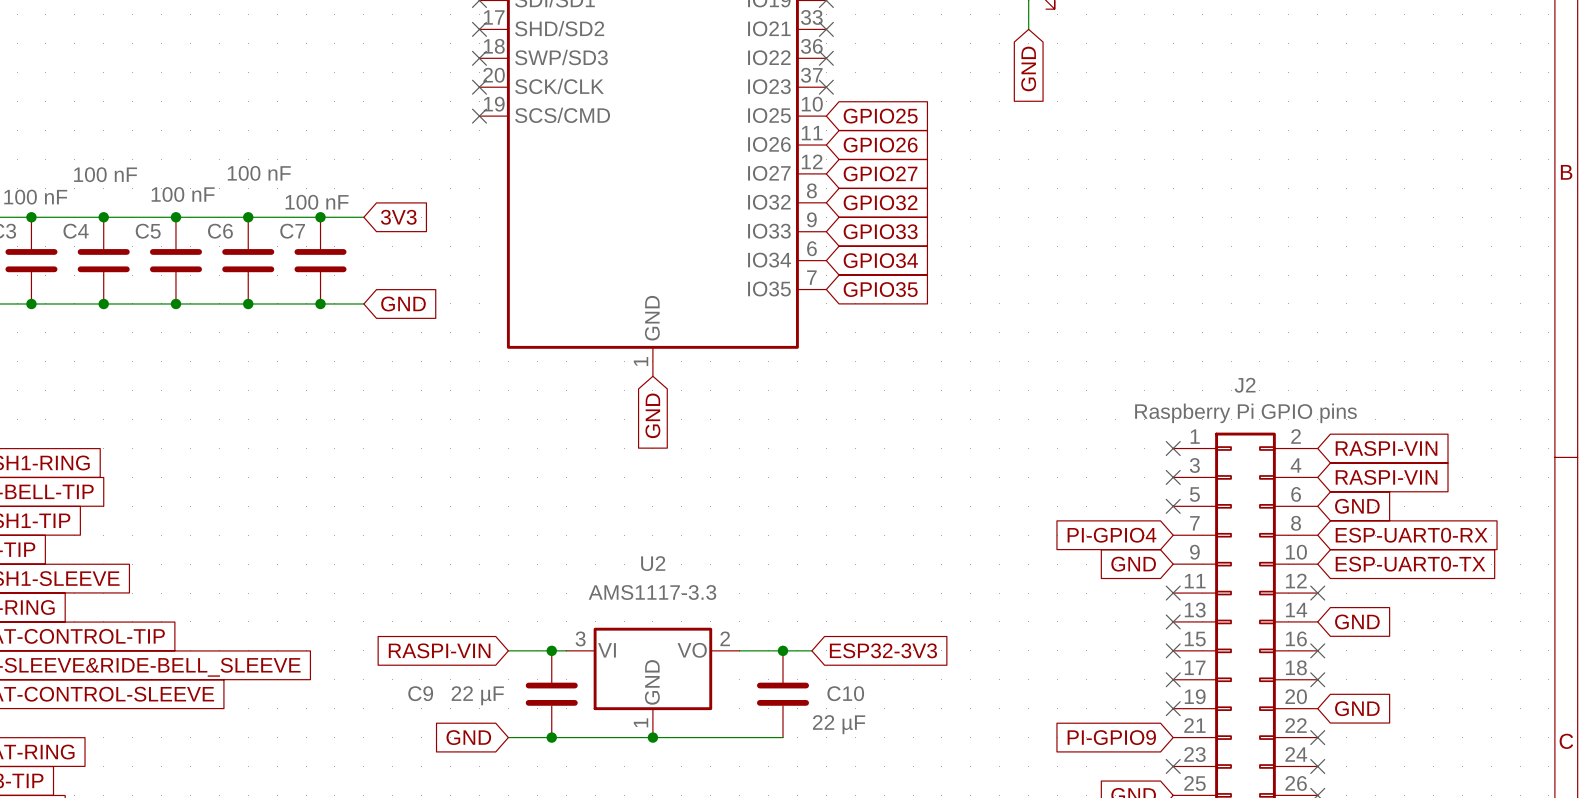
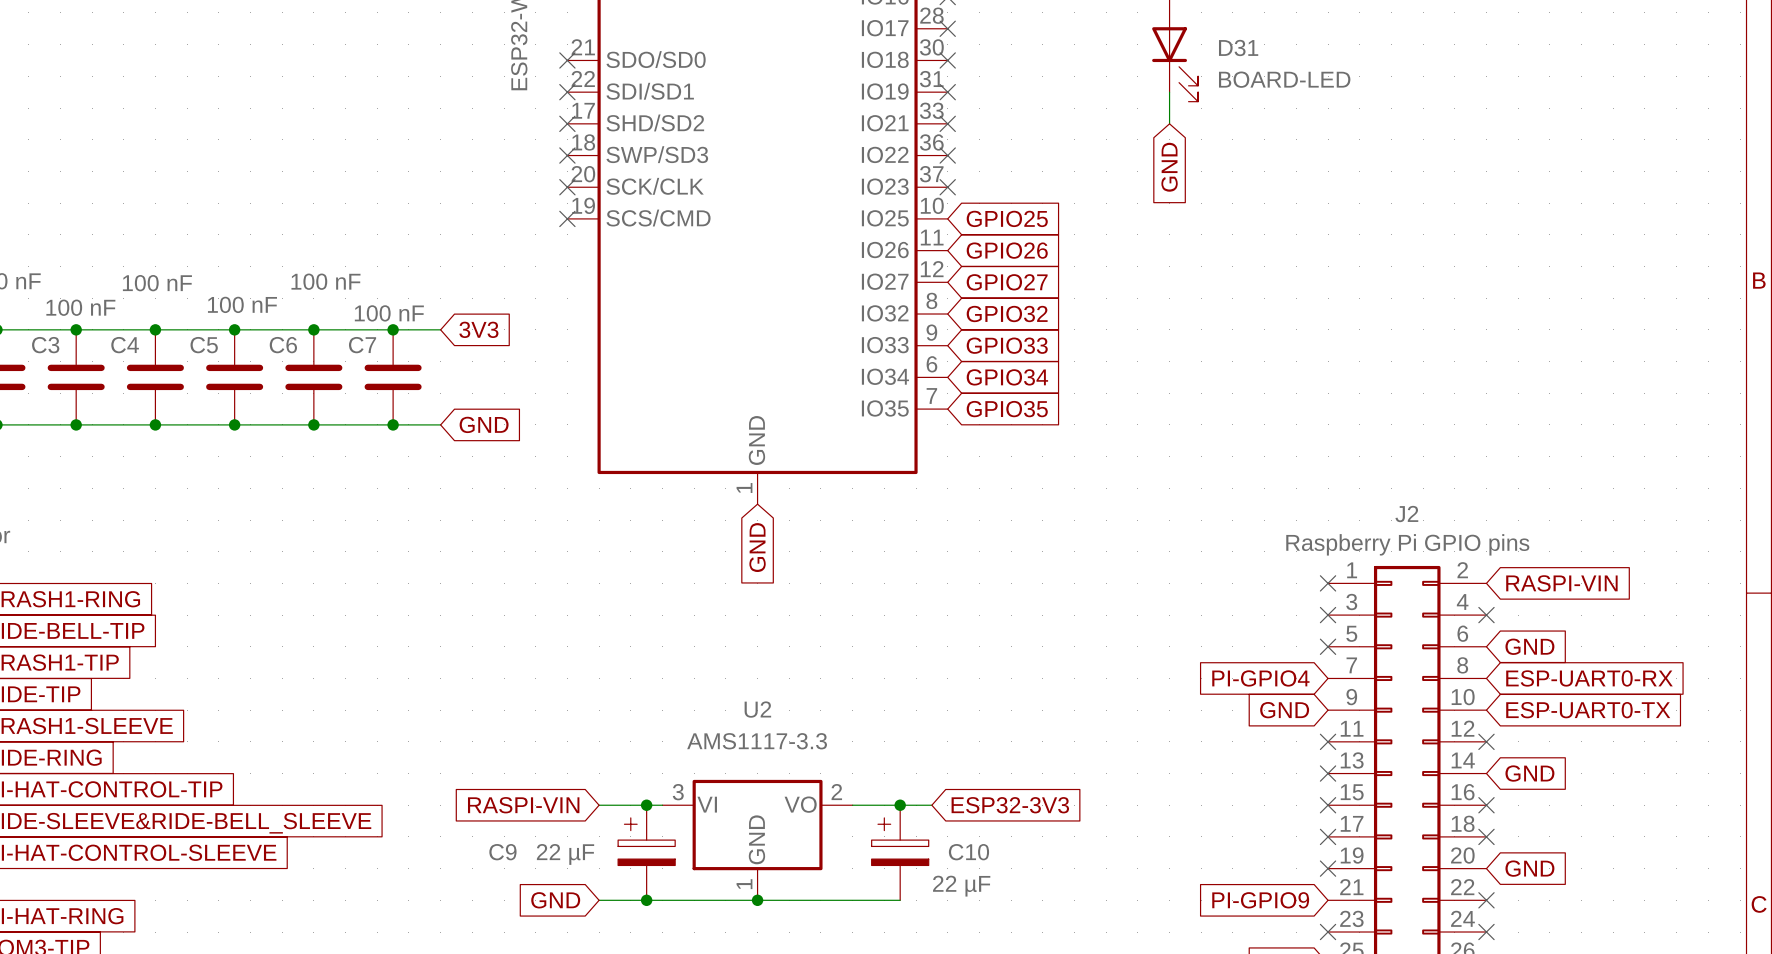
no-connect mark: none -> (1486, 615)
global label: RASPI-VIN (1386, 477) -> none
C9 symbol: [525, 650, 578, 738] -> [618, 805, 676, 901]
C10 symbol: [756, 650, 810, 738] -> [871, 805, 929, 901]

